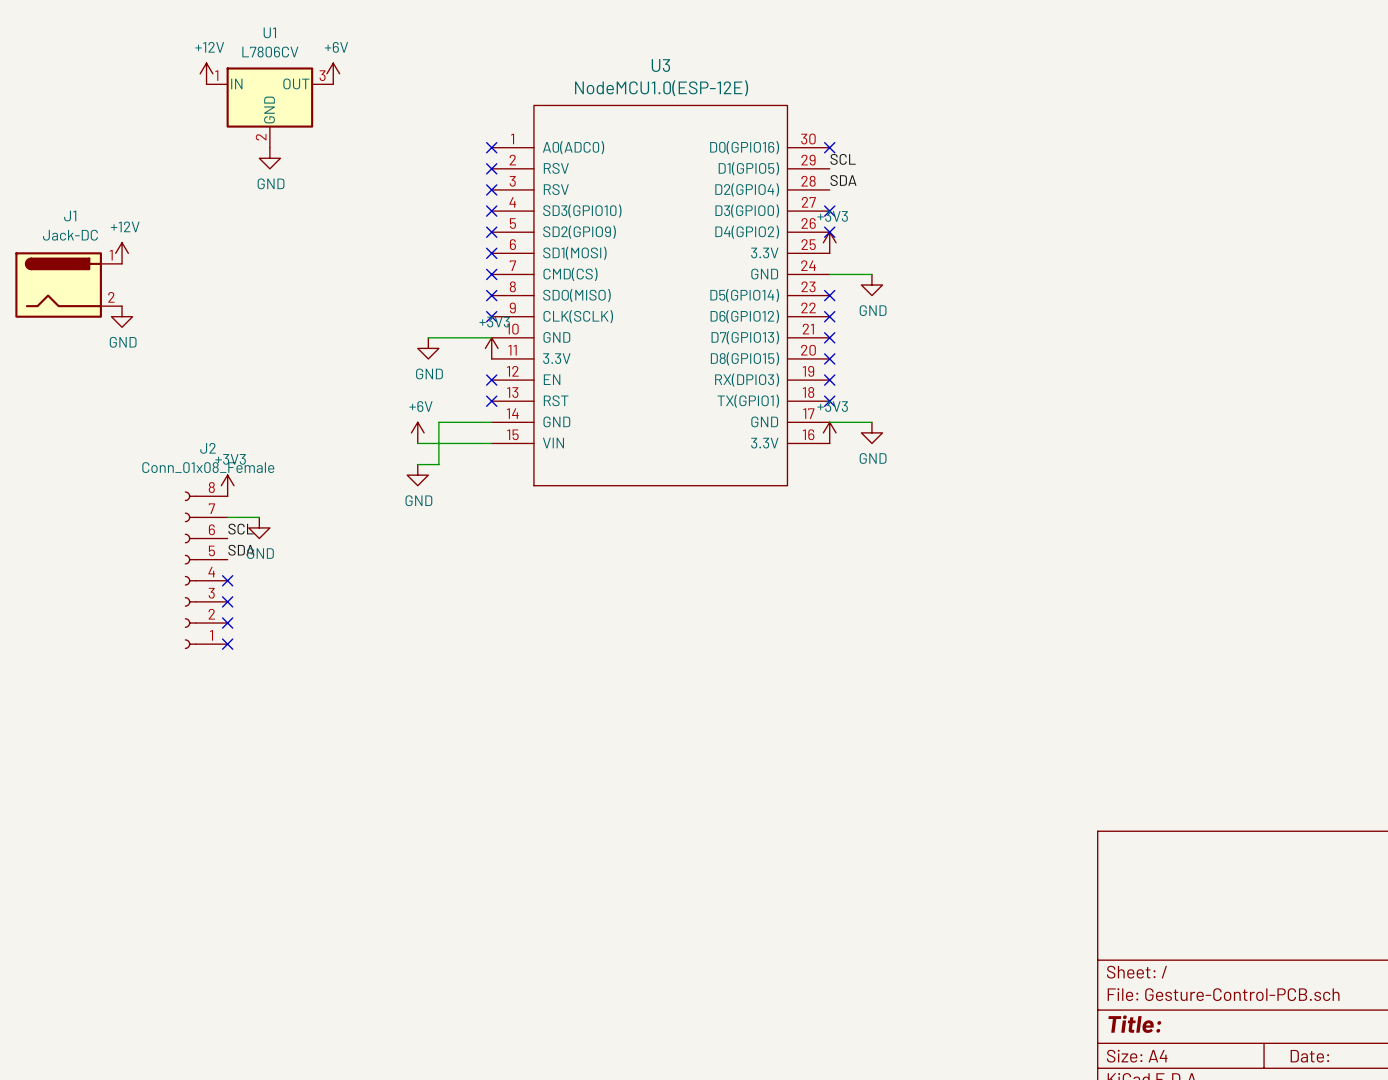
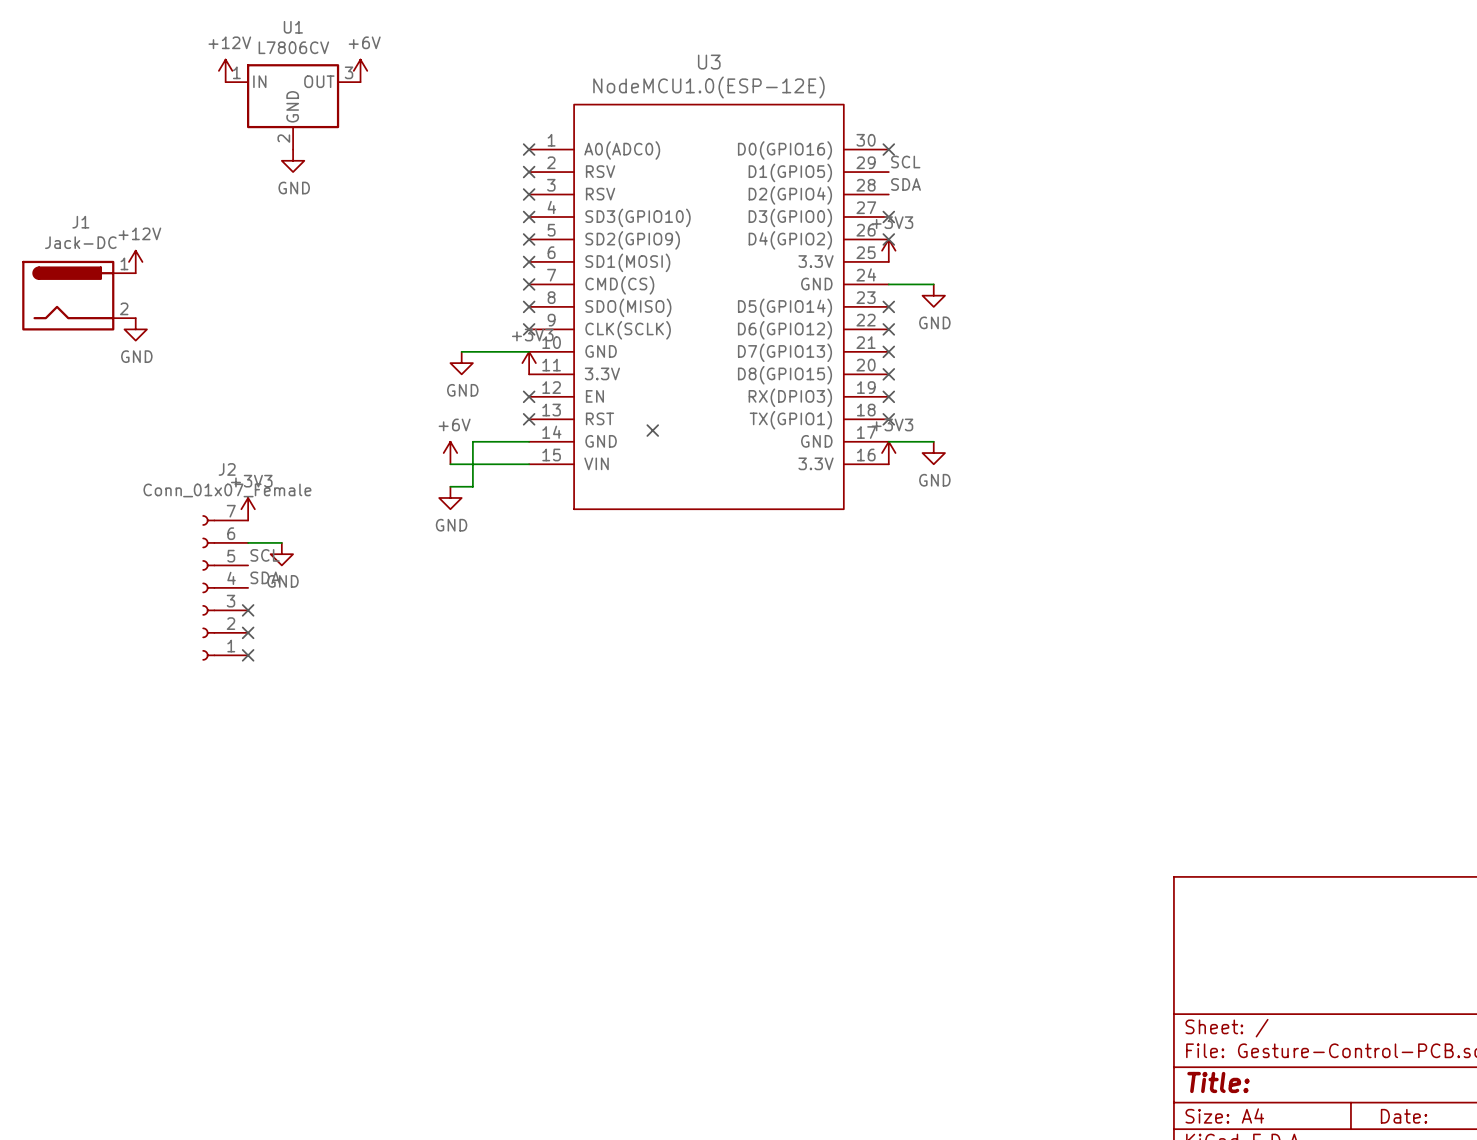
no-connect mark: none -> (652, 430)
J2 value: Conn_01x08_Female (208, 467) -> Conn_01x07_Female (227, 490)
J2 symbol: [184, 491, 228, 650] -> [202, 515, 249, 661]
no-connect mark: (227, 644) -> none

